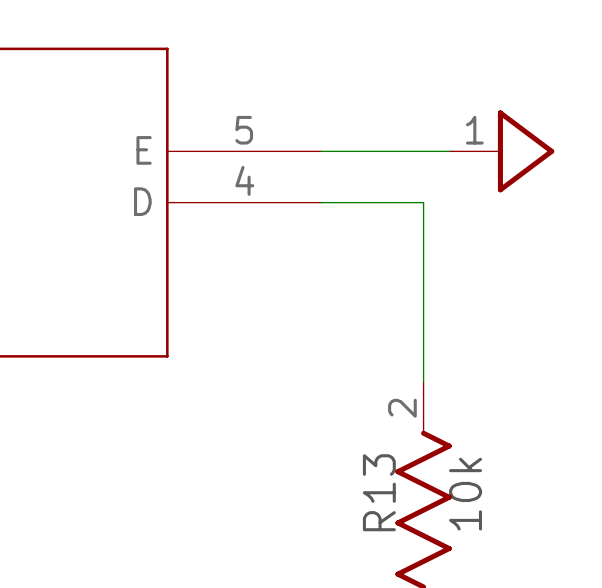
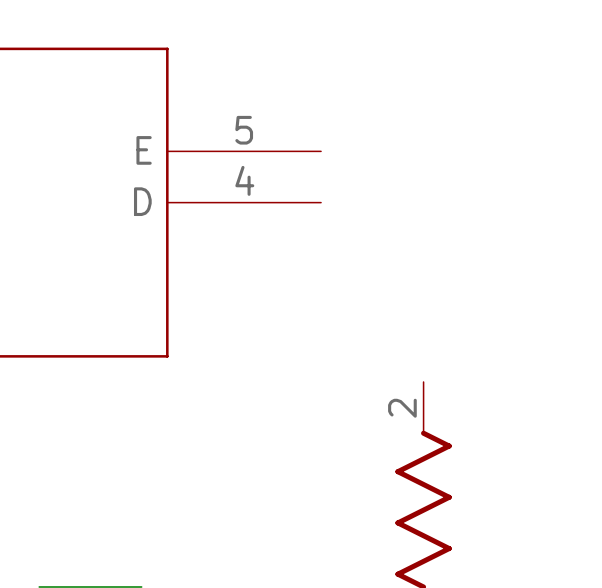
wire: (321, 151) (449, 151) -> none
power symbol: (501, 151) -> none
wire: (321, 202) (423, 202) (423, 381) -> none
text: R13 (379, 492) -> none
text: 10k (465, 494) -> none
wire: none -> (39, 586) (141, 586)

